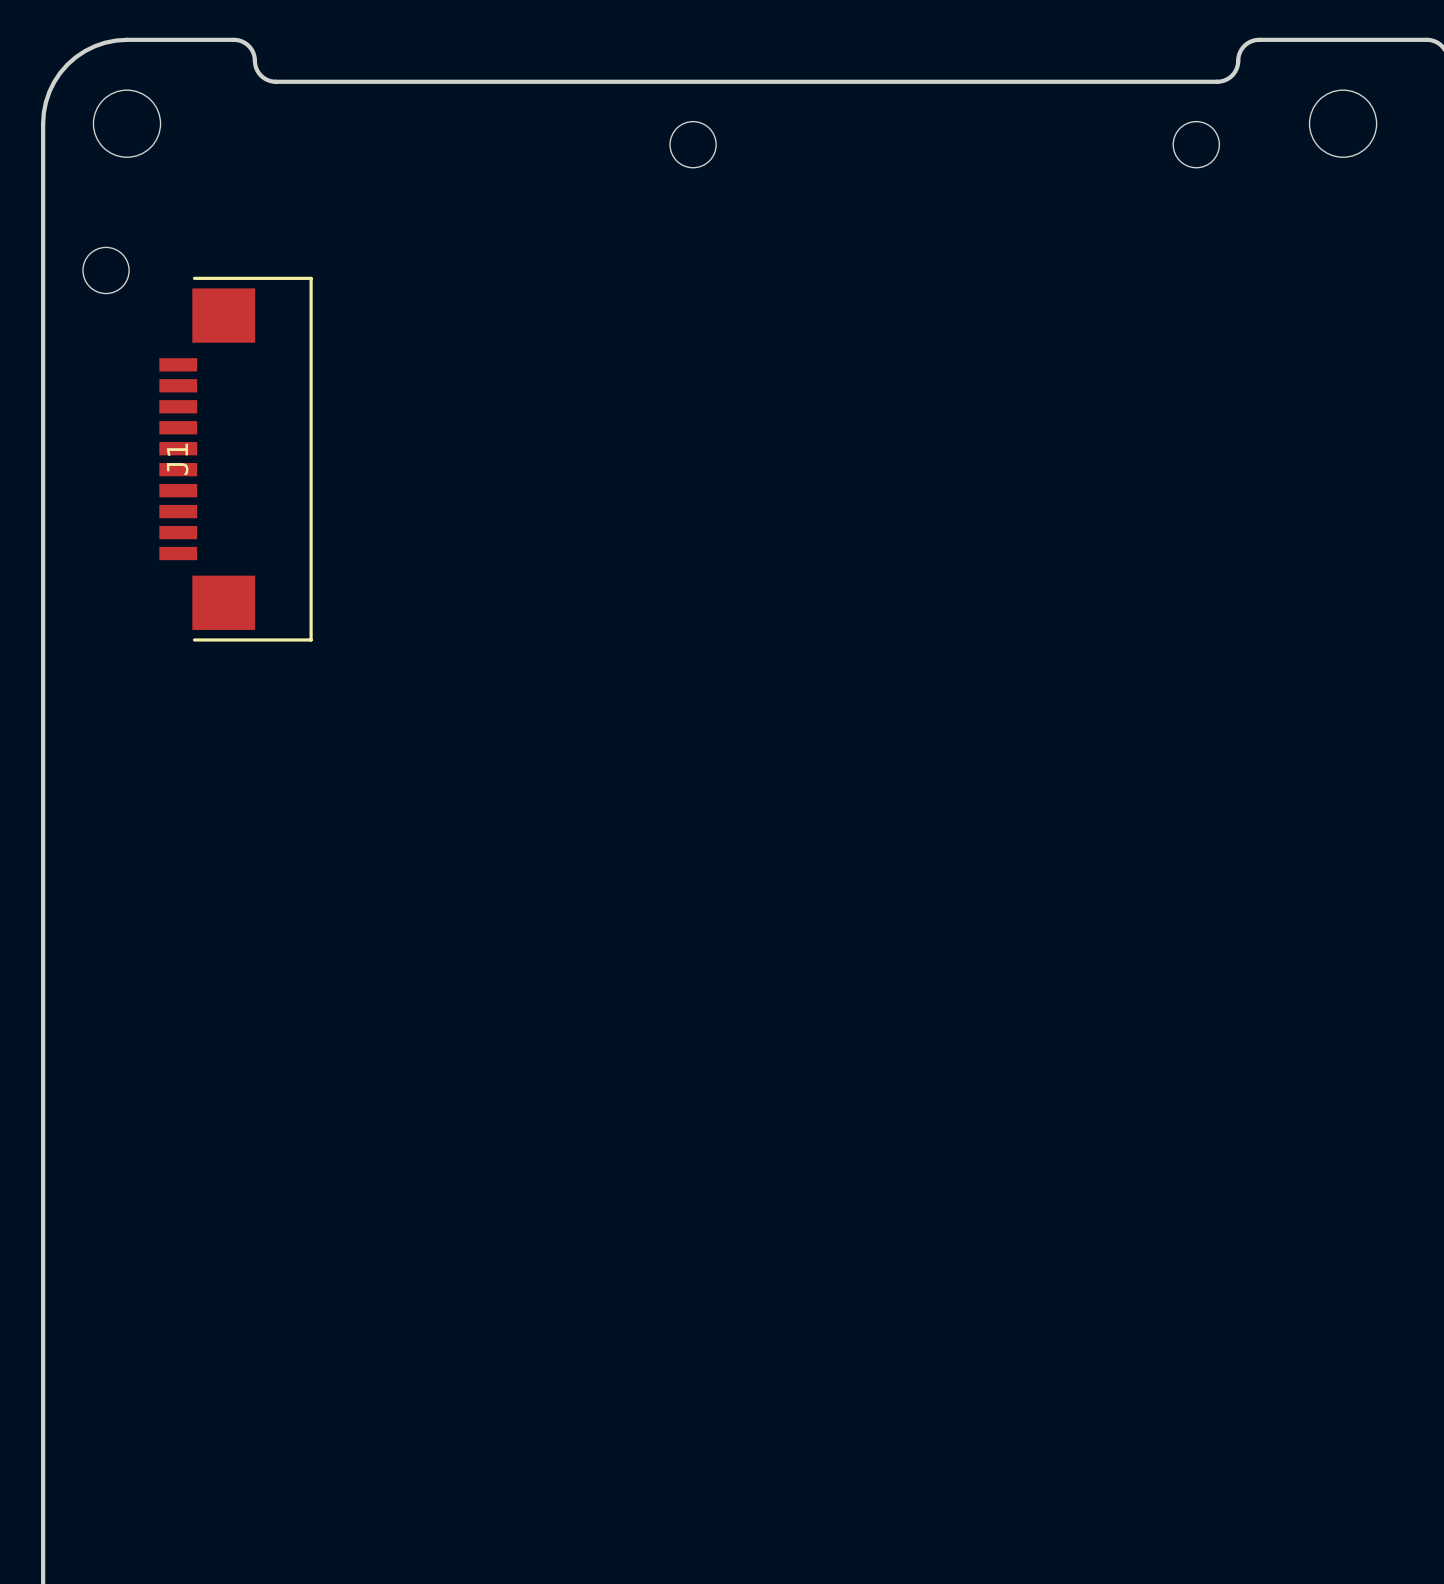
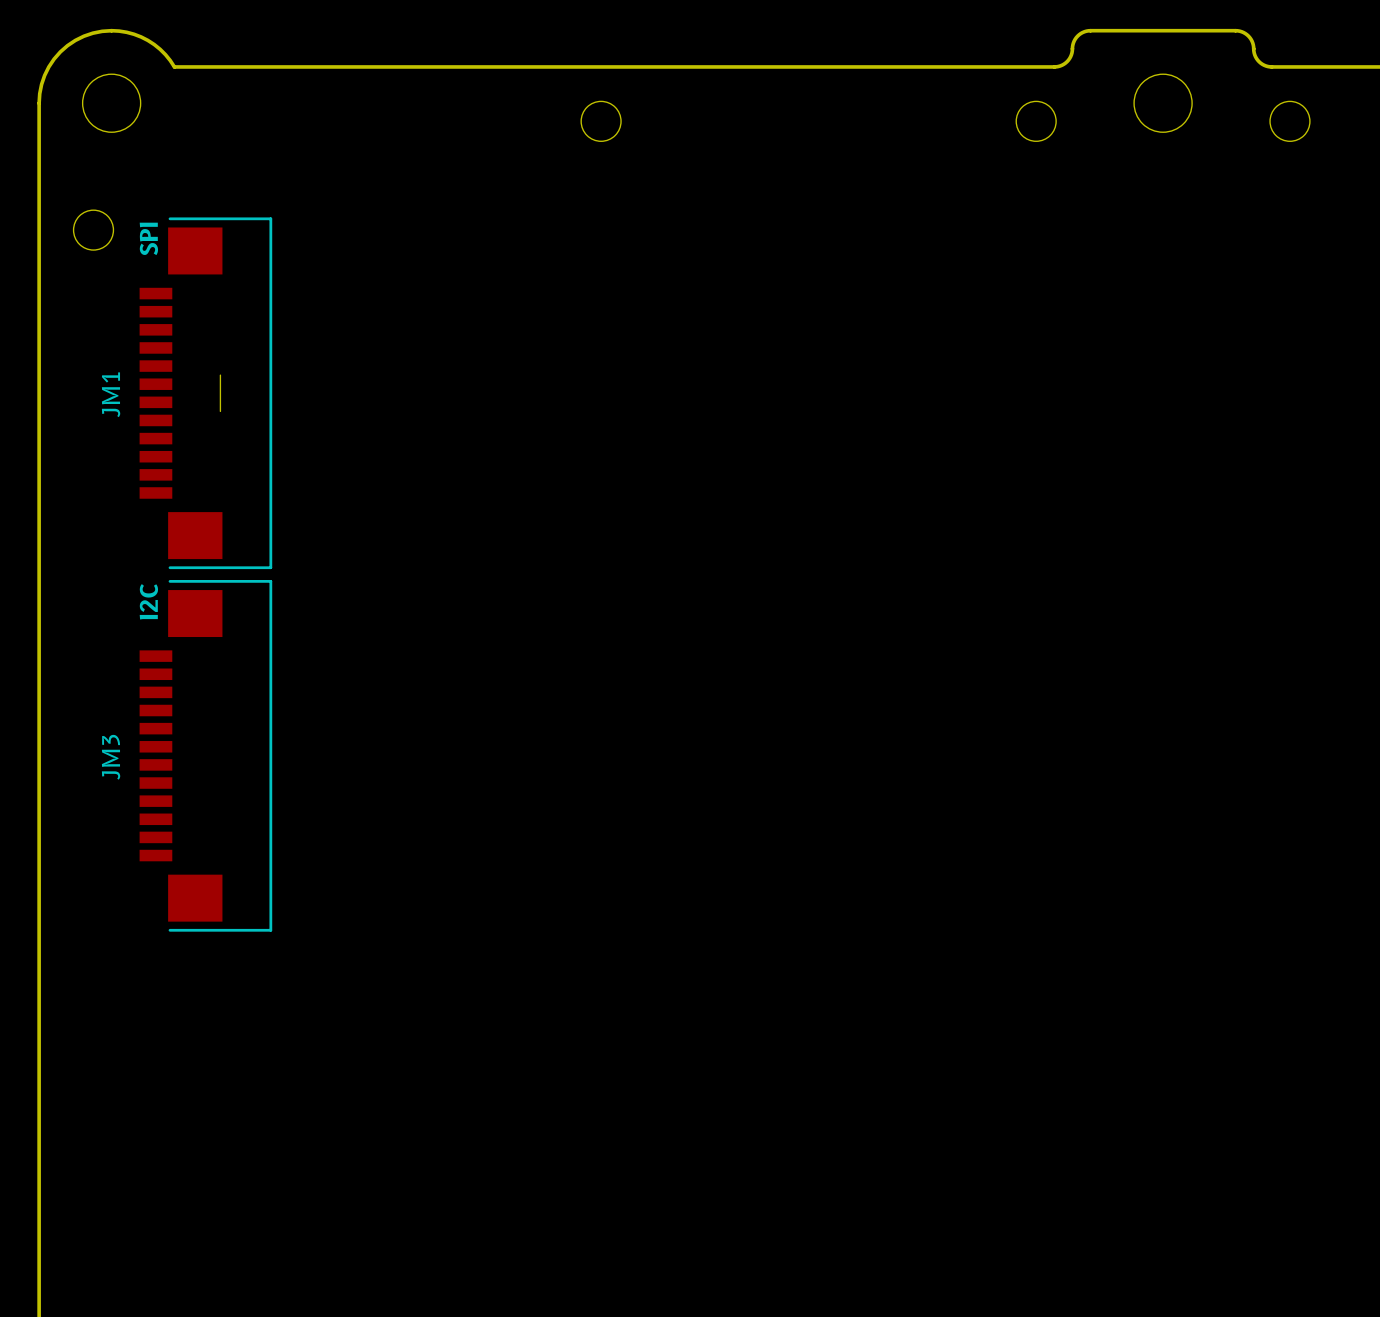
board edge: (126, 39) (238, 40) (245, 43) (251, 49) (256, 67) (261, 75) (266, 79) (275, 81) -> (111, 30) (134, 34) (147, 40) (160, 49) (174, 67) (240, 66)
text: none -> SPI (148, 238)
board edge: none -> (220, 375) (220, 411)
J1: (236, 459) -> none
JM1: none -> (205, 393)
text: none -> I2C (148, 601)
JM3: none -> (205, 755)

